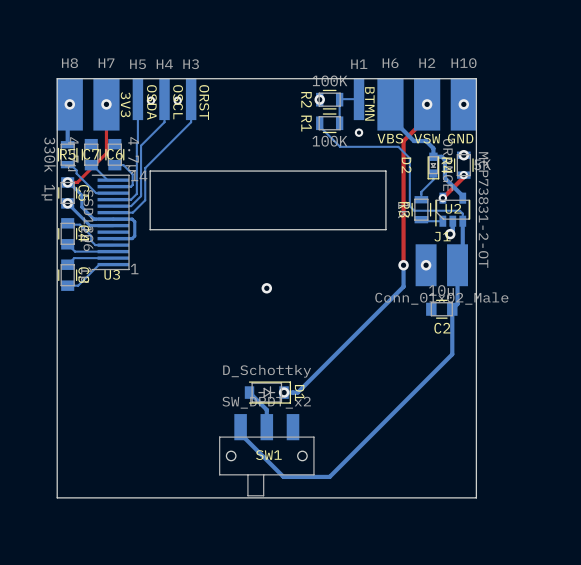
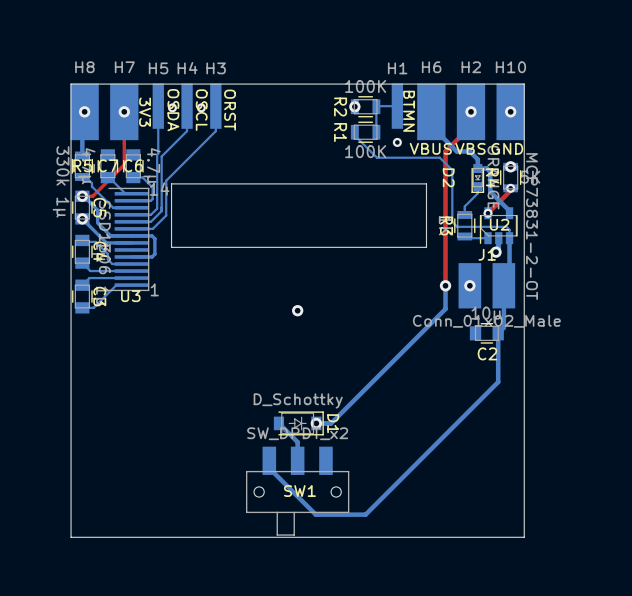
H6 value: VBS (390, 138) -> VBUS (430, 148)
H2 value: VSW (427, 138) -> VBS (470, 148)

